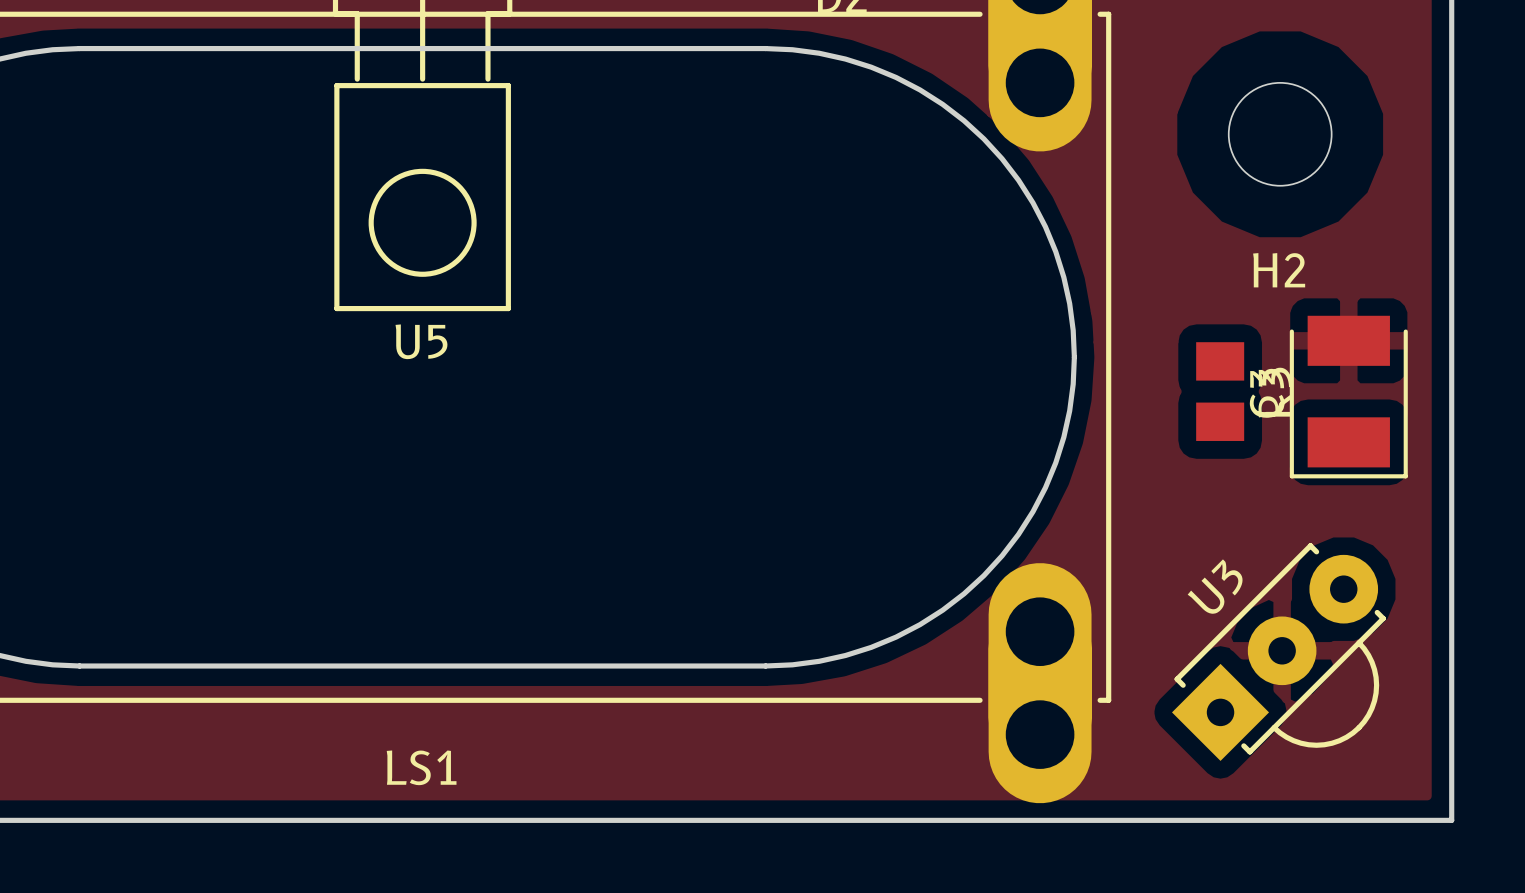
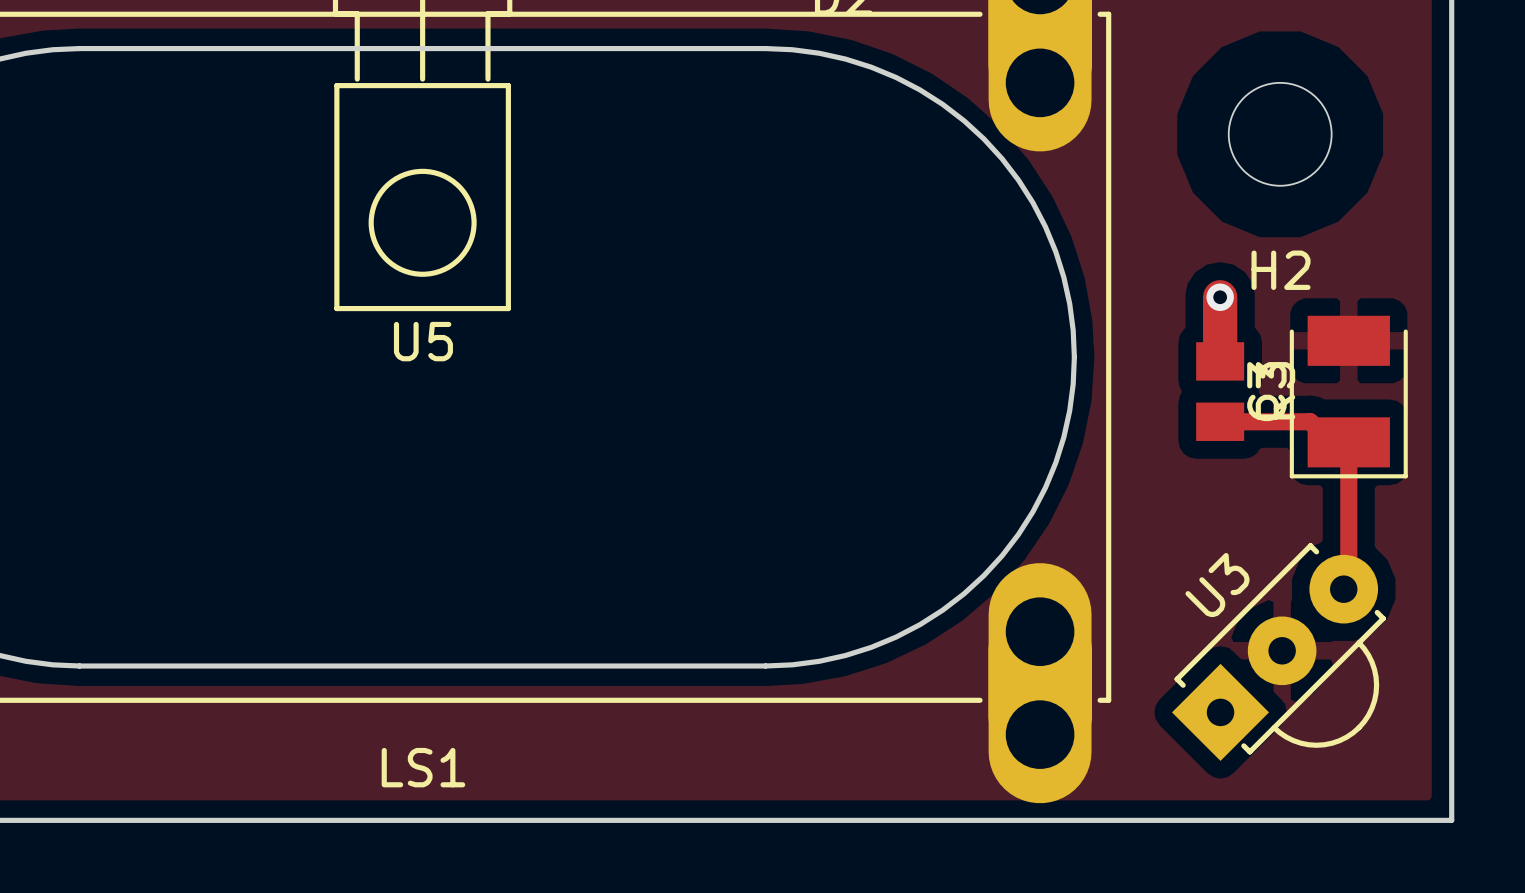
track: none -> (1220, 297) (1220, 361)
via: none -> (1220, 297)
track: none -> (1220, 421) (1310, 421) (1323, 434) (1340, 434) (1348, 442) (1348, 584) (1343, 589)

